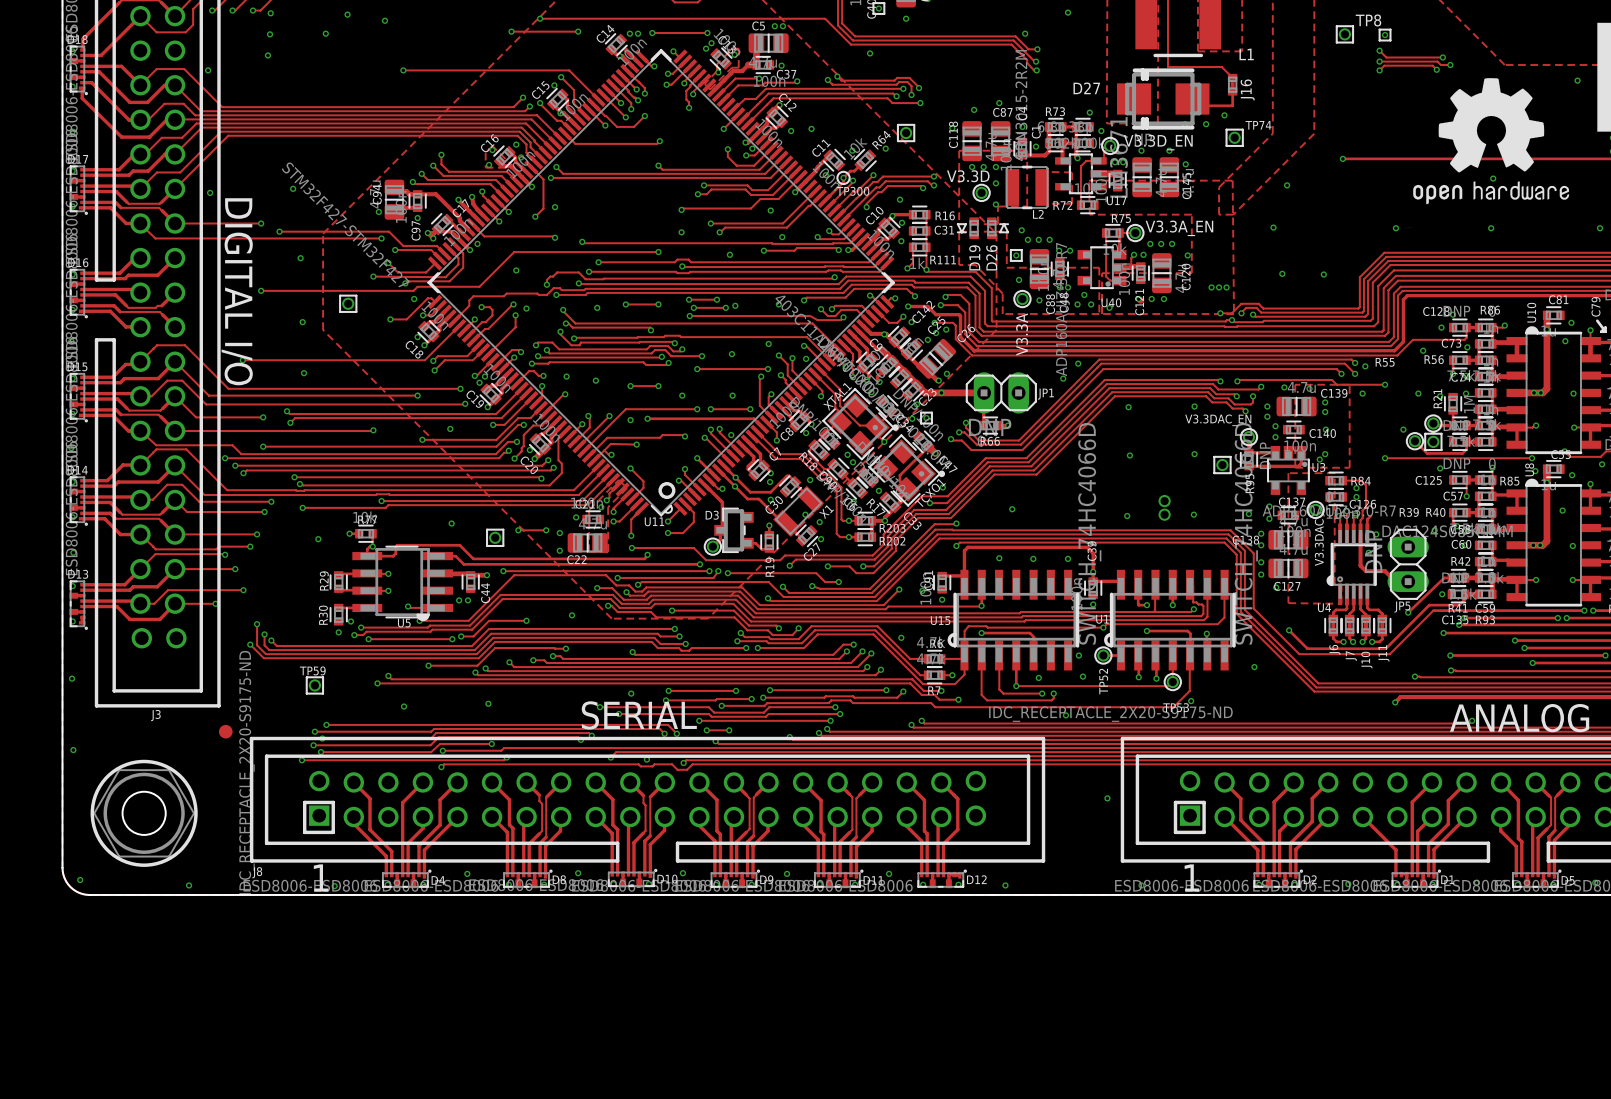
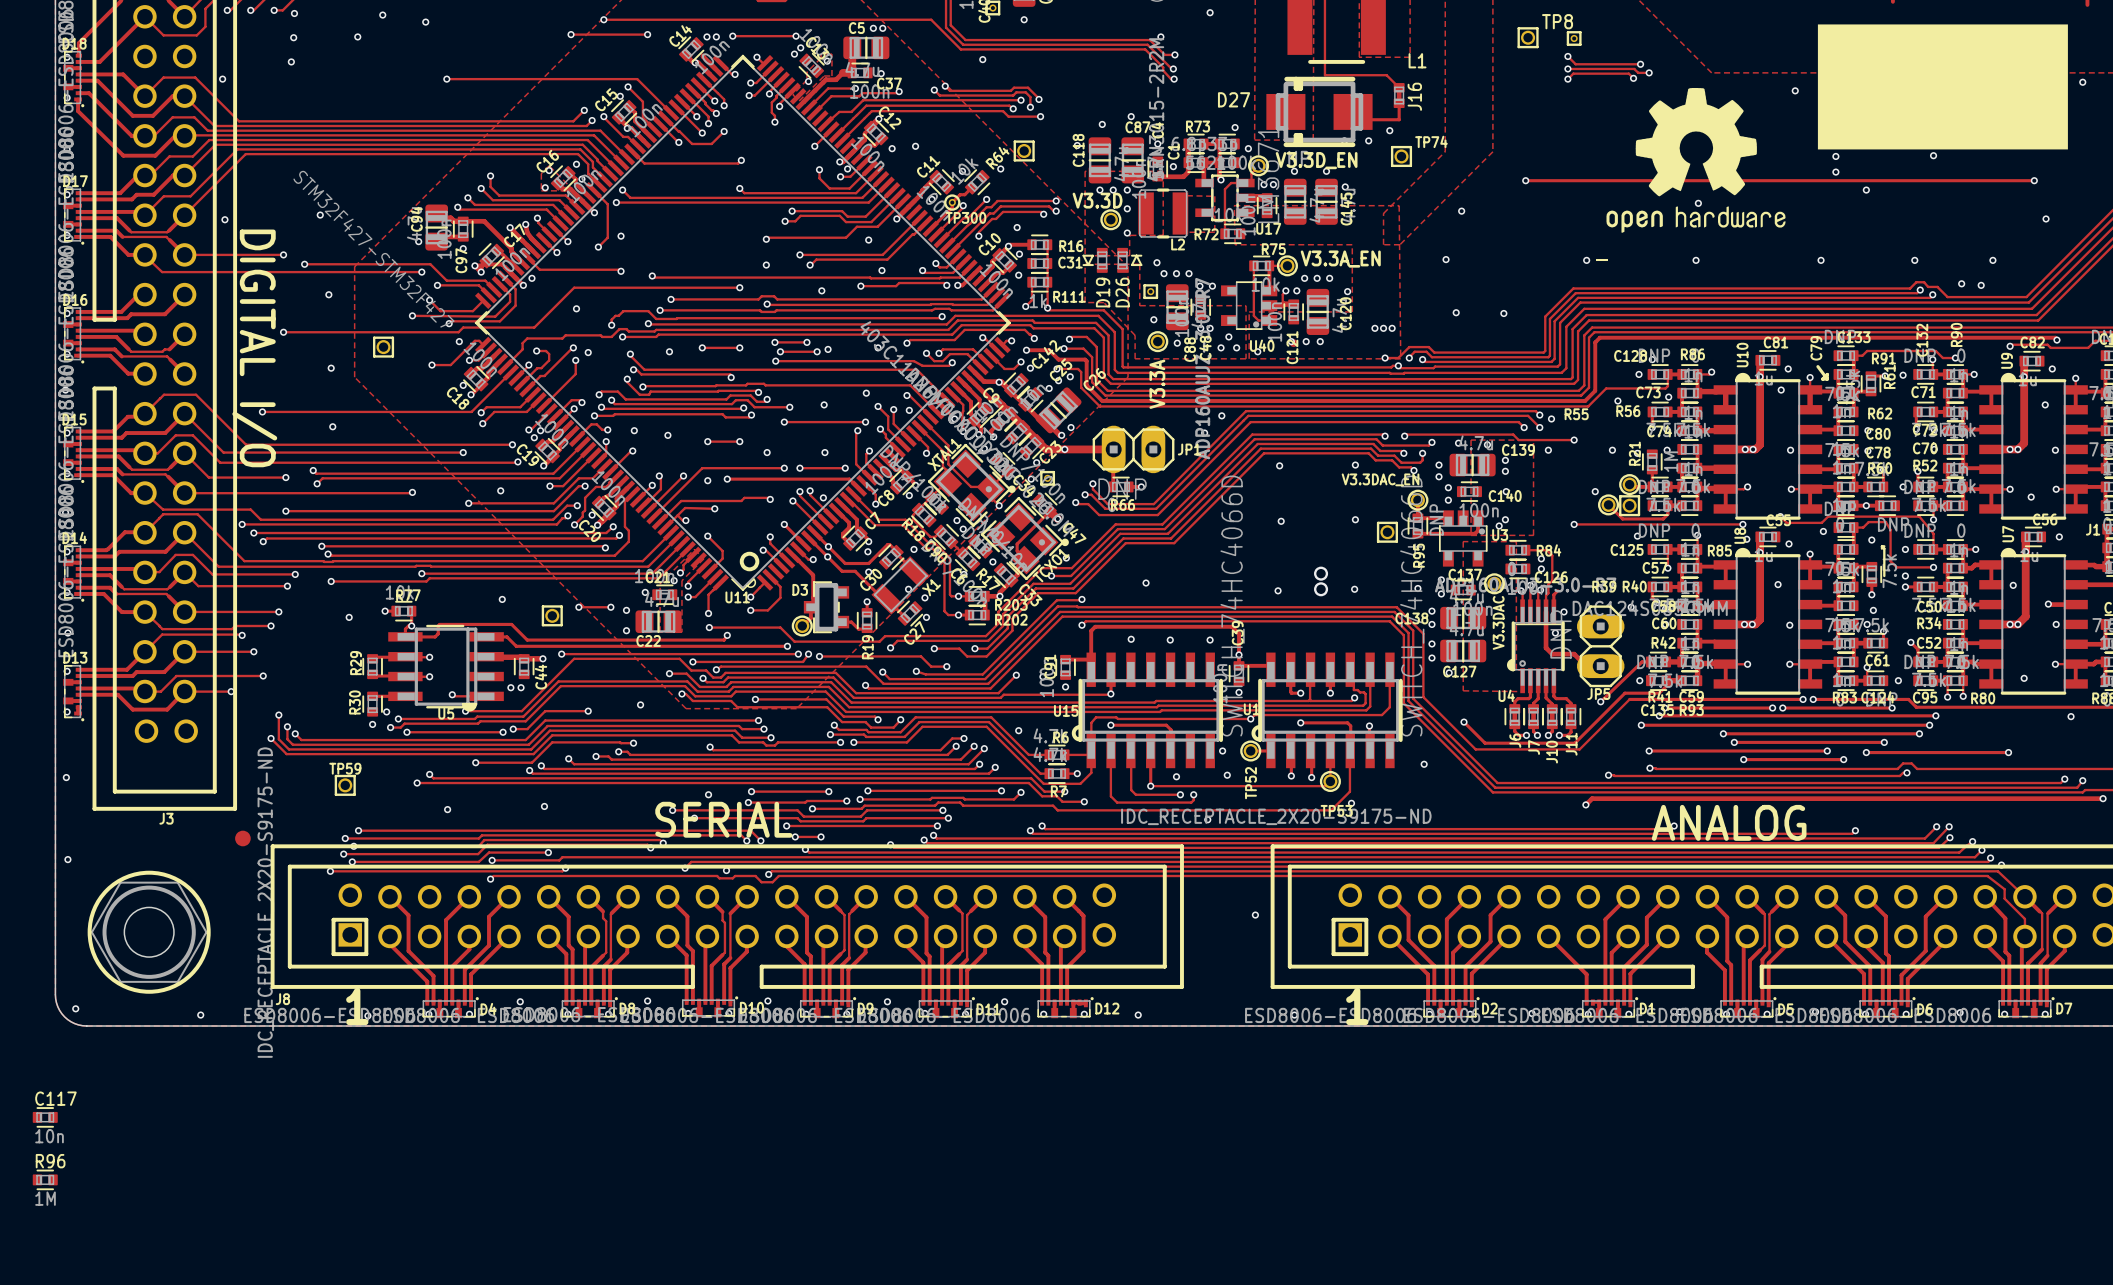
C117: none -> 10n (45, 1117)
R96: none -> 1M (45, 1179)

